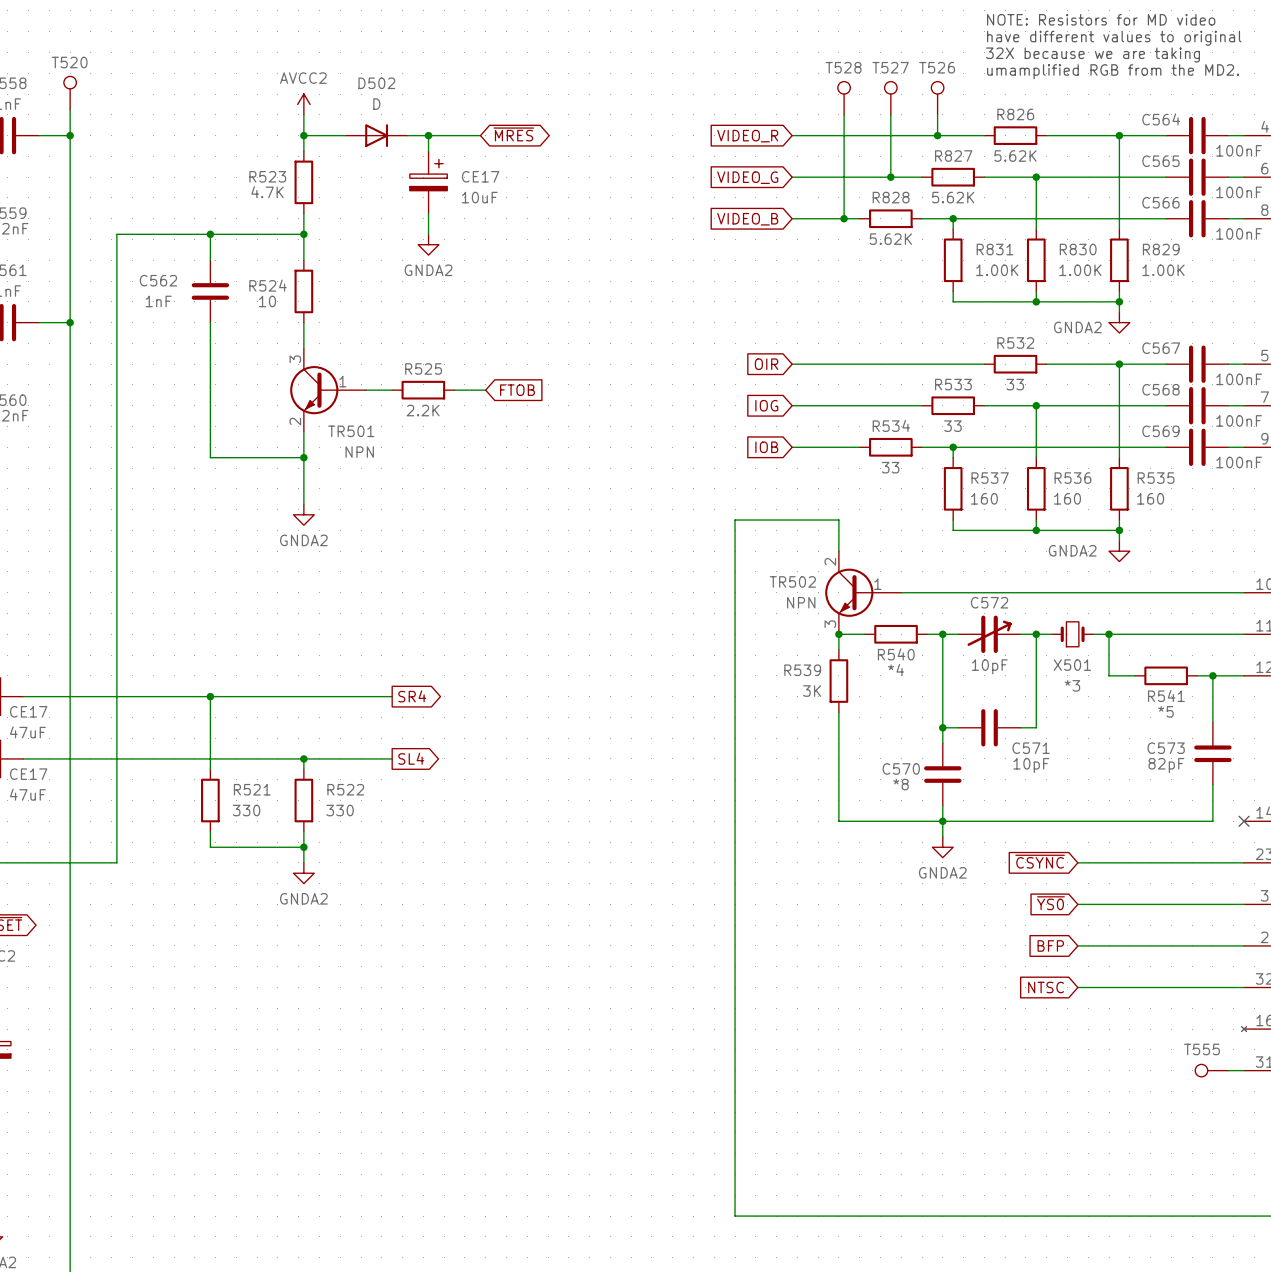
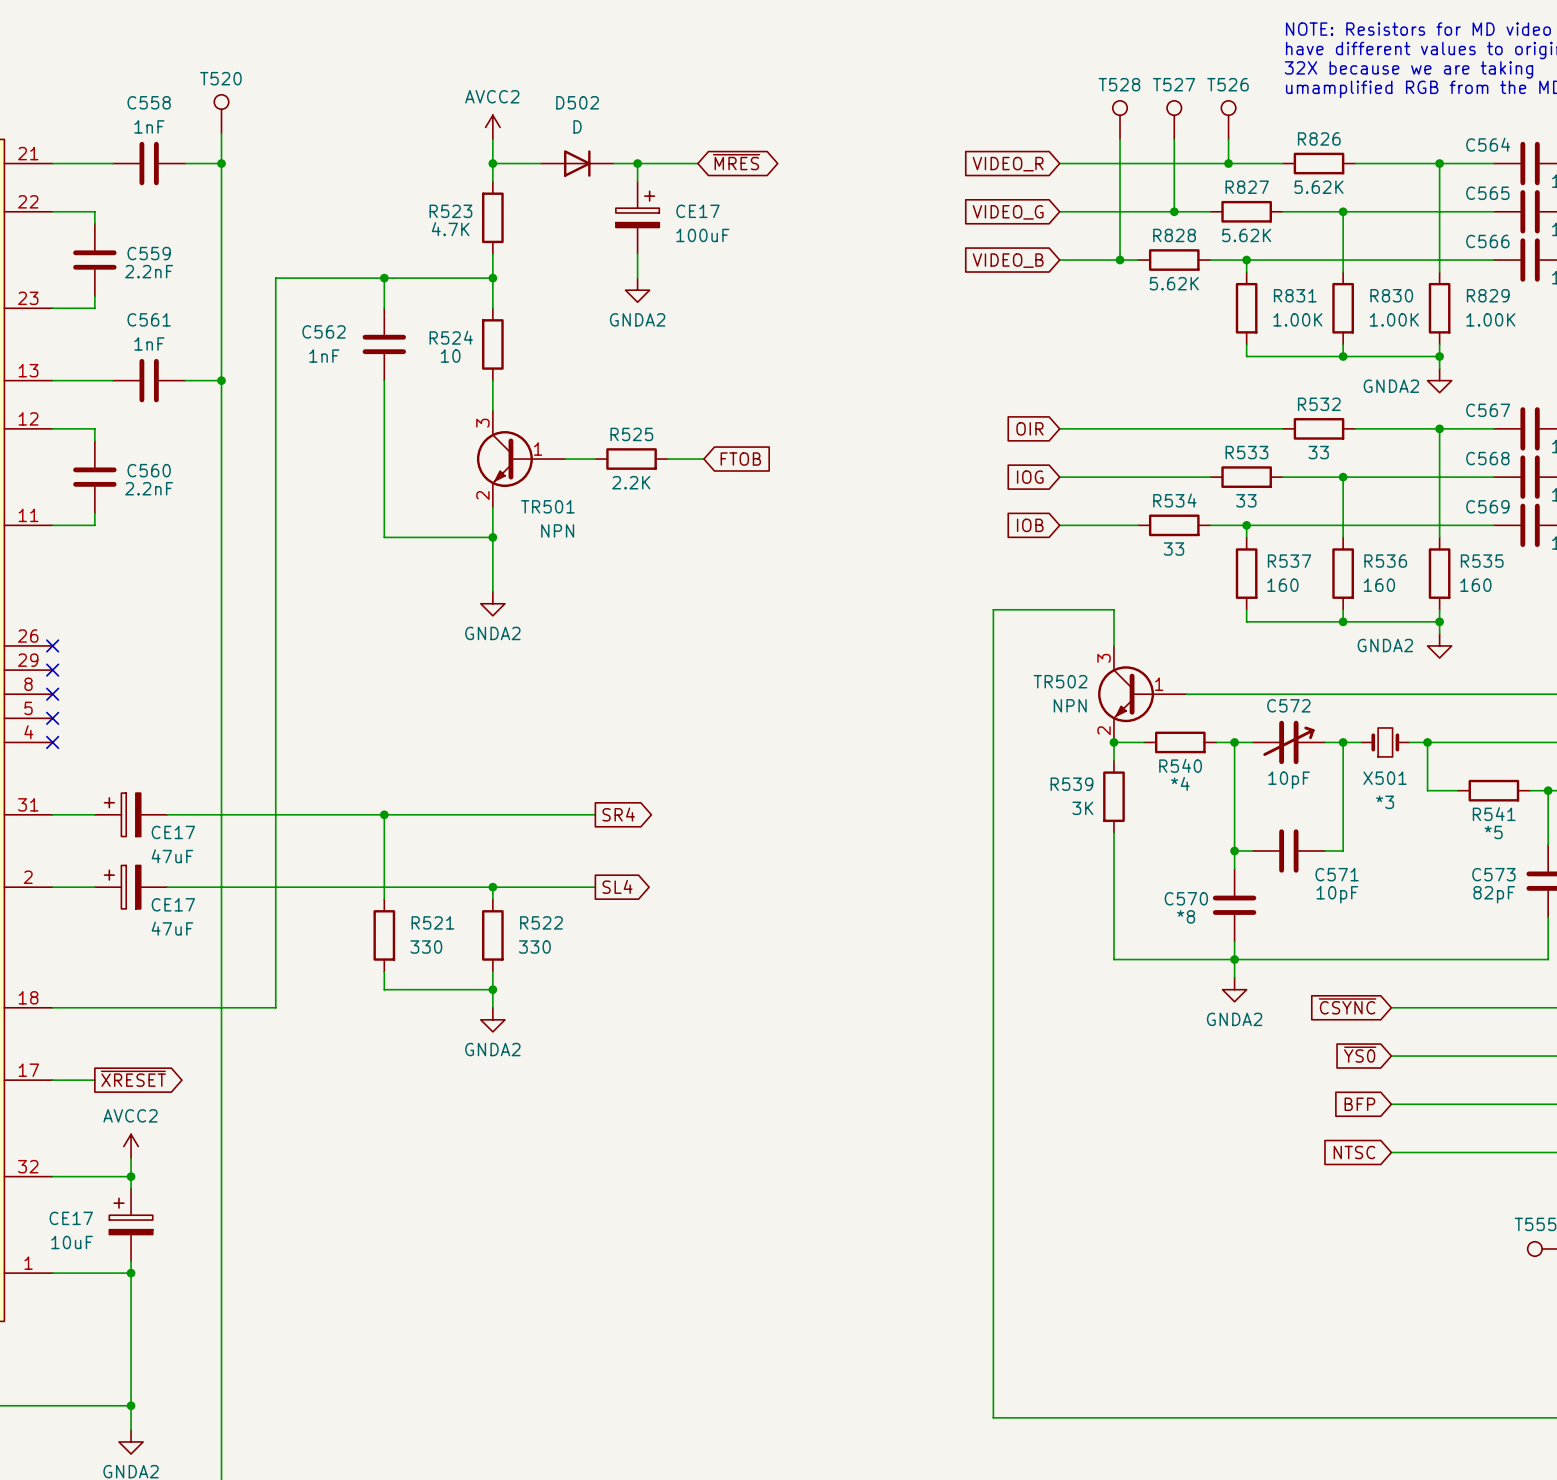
CE17 value: 10uF (479, 197) -> 100uF (702, 235)
TR502 pin number: 2 (830, 561) -> 3 (1104, 658)
TR502 pin number: 3 (830, 624) -> 2 (1104, 730)

